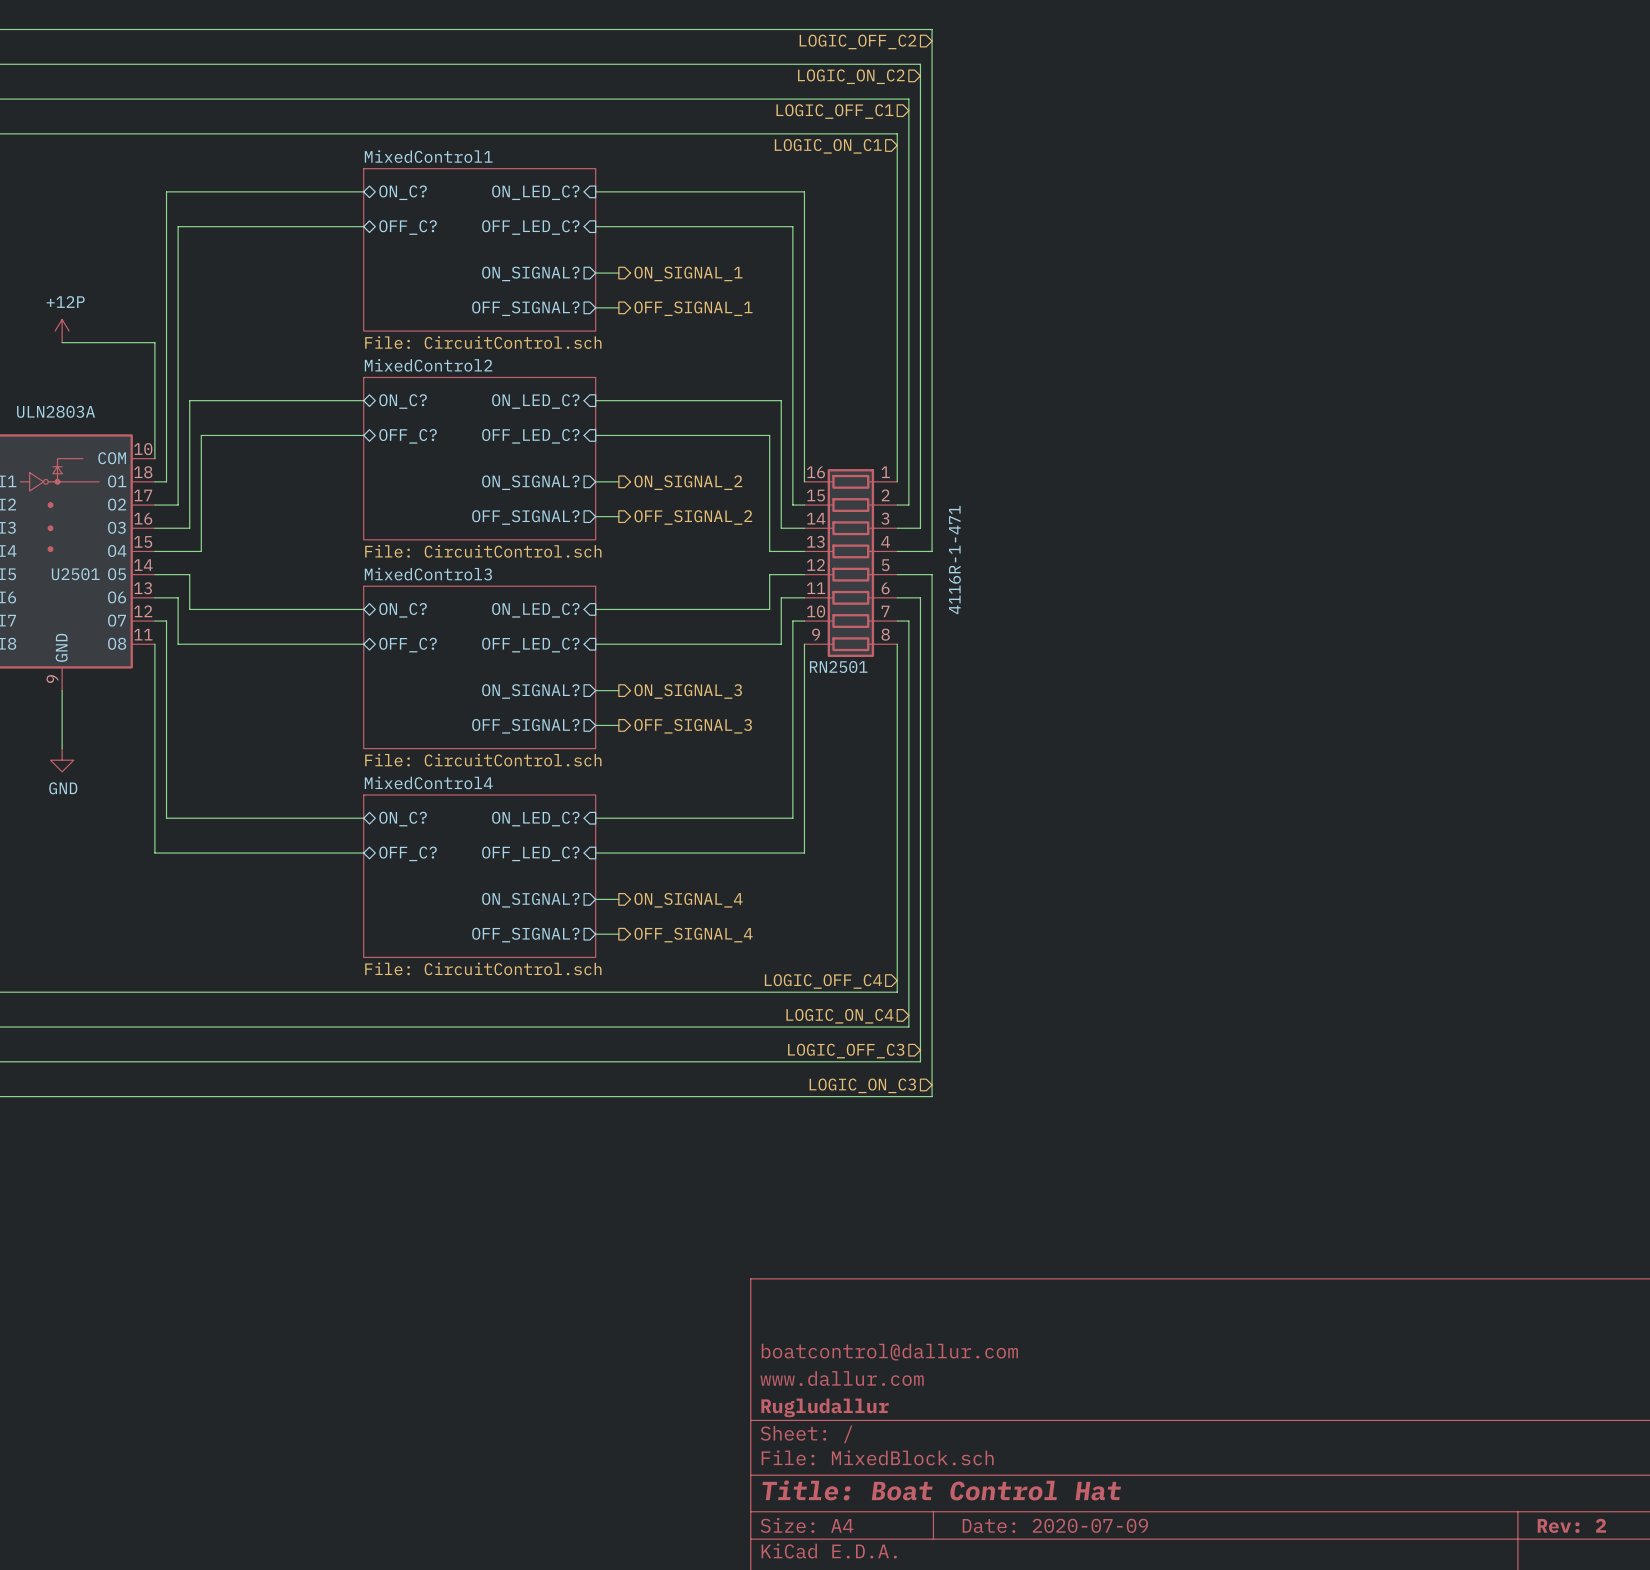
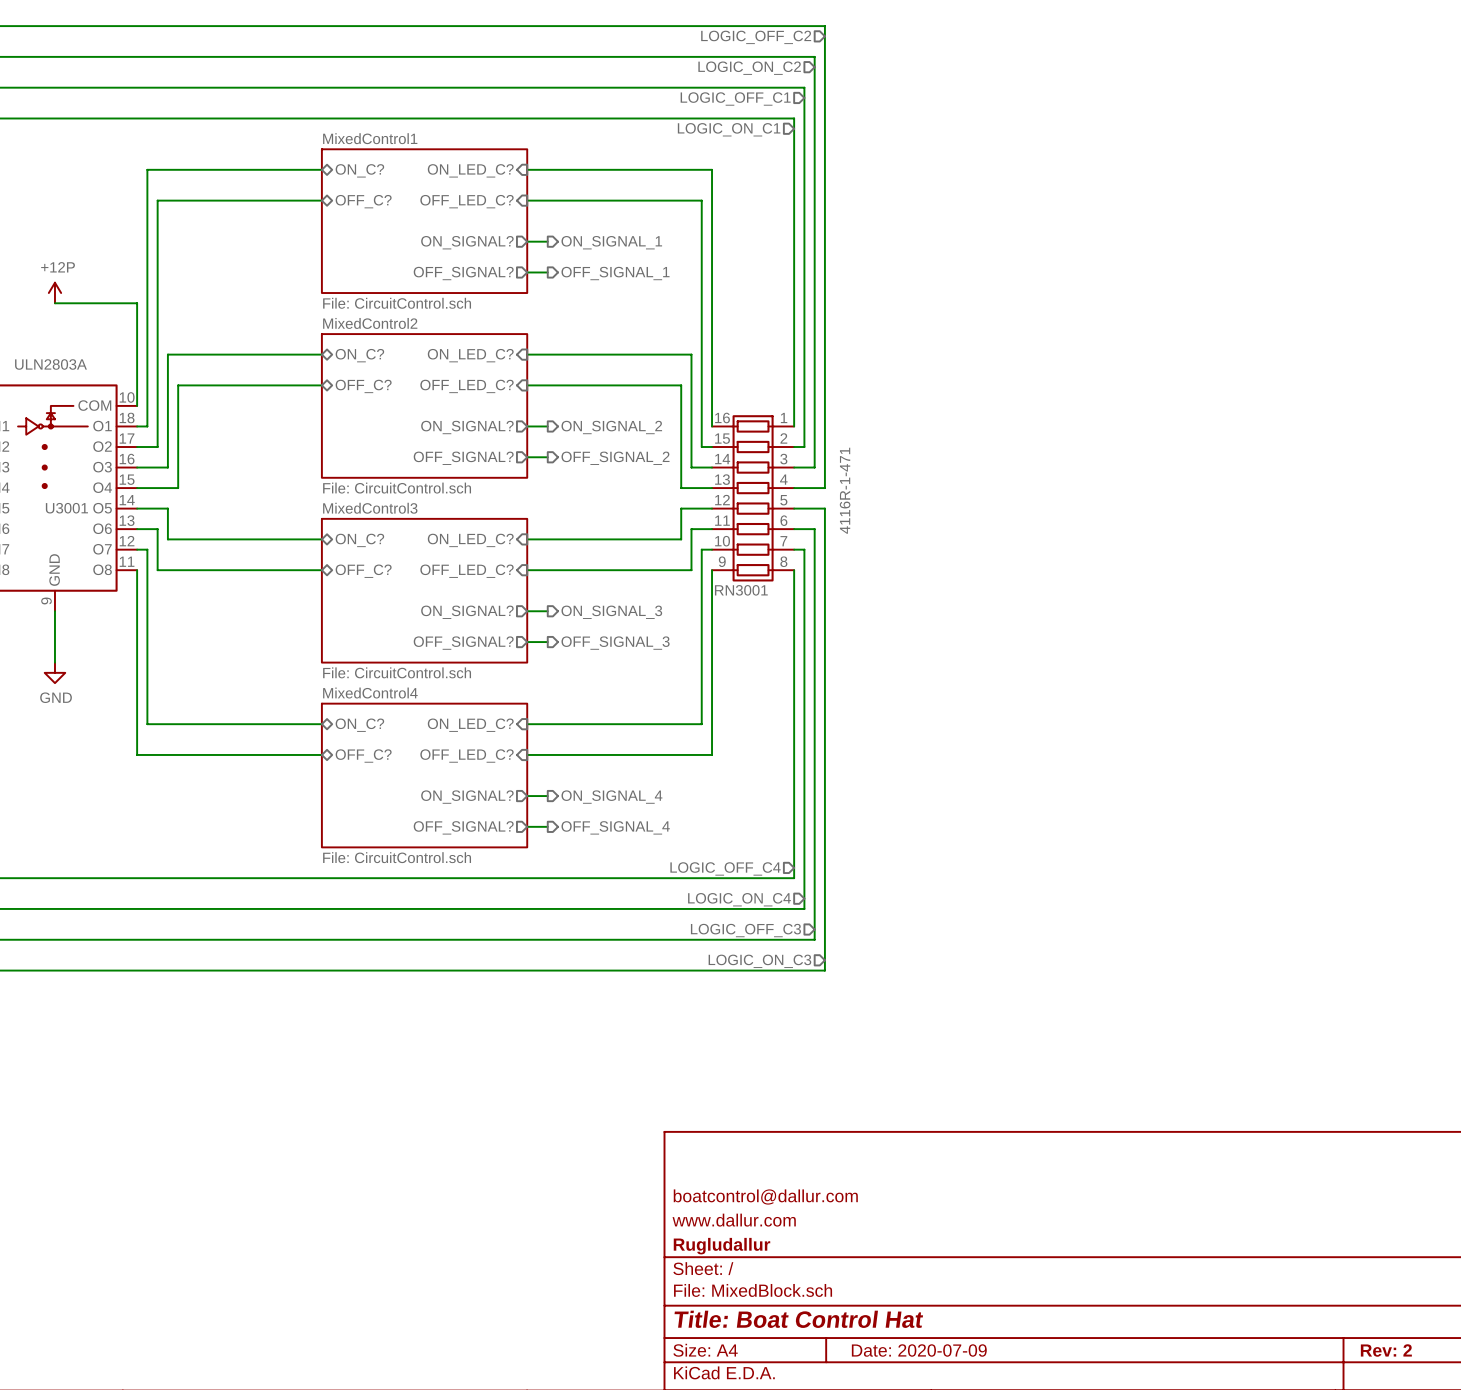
U2501 name: U2501 (75, 574) -> U3001 (66, 508)
RN2501 name: RN2501 (838, 666) -> RN3001 (741, 590)

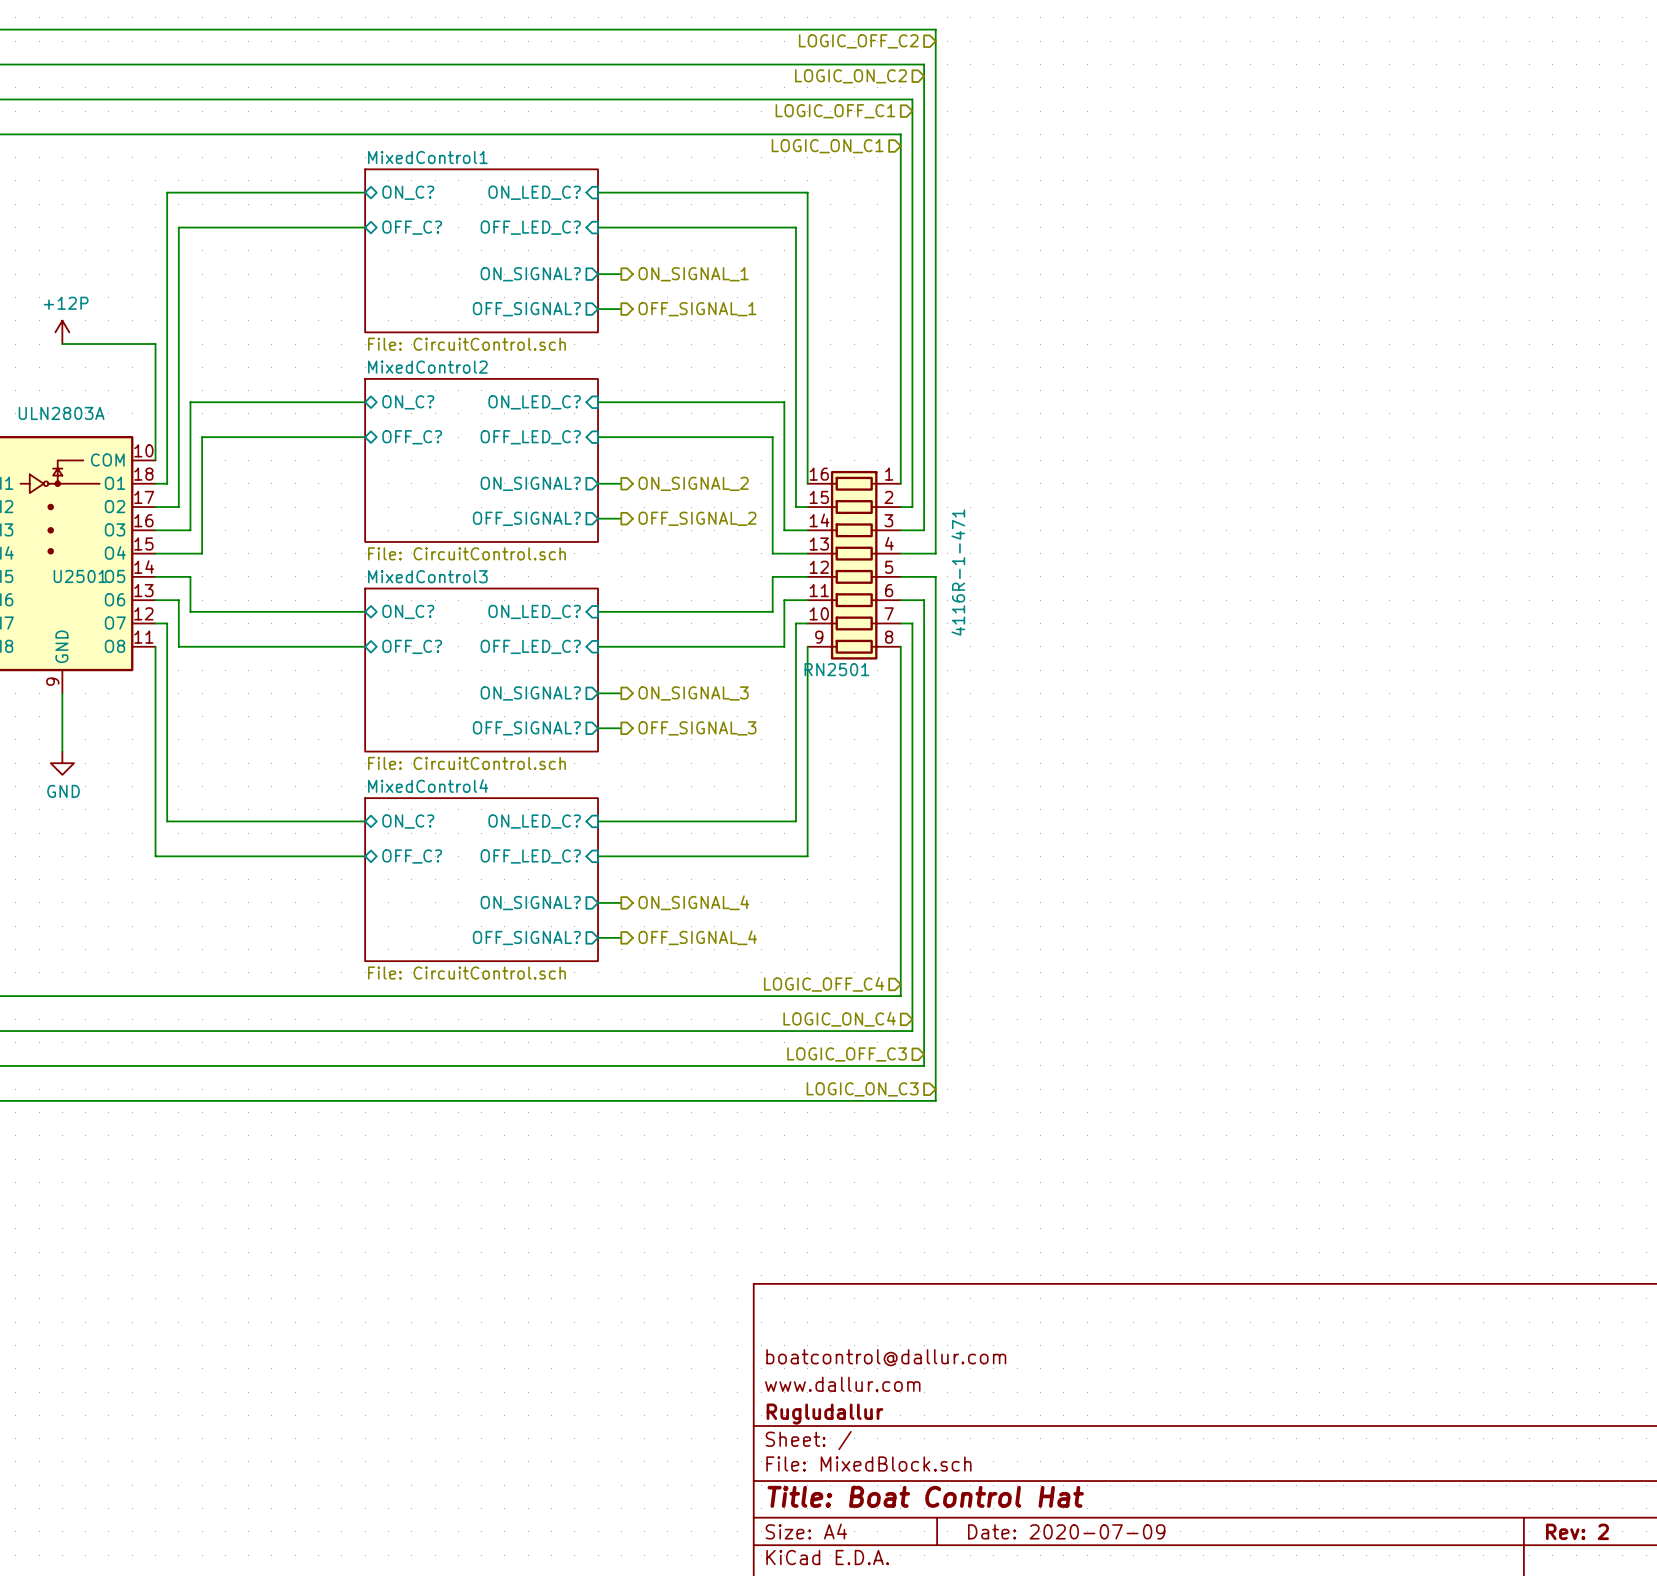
U3001 name: U3001 (66, 508) -> U2501 (80, 576)
RN3001 name: RN3001 (741, 590) -> RN2501 (836, 669)

